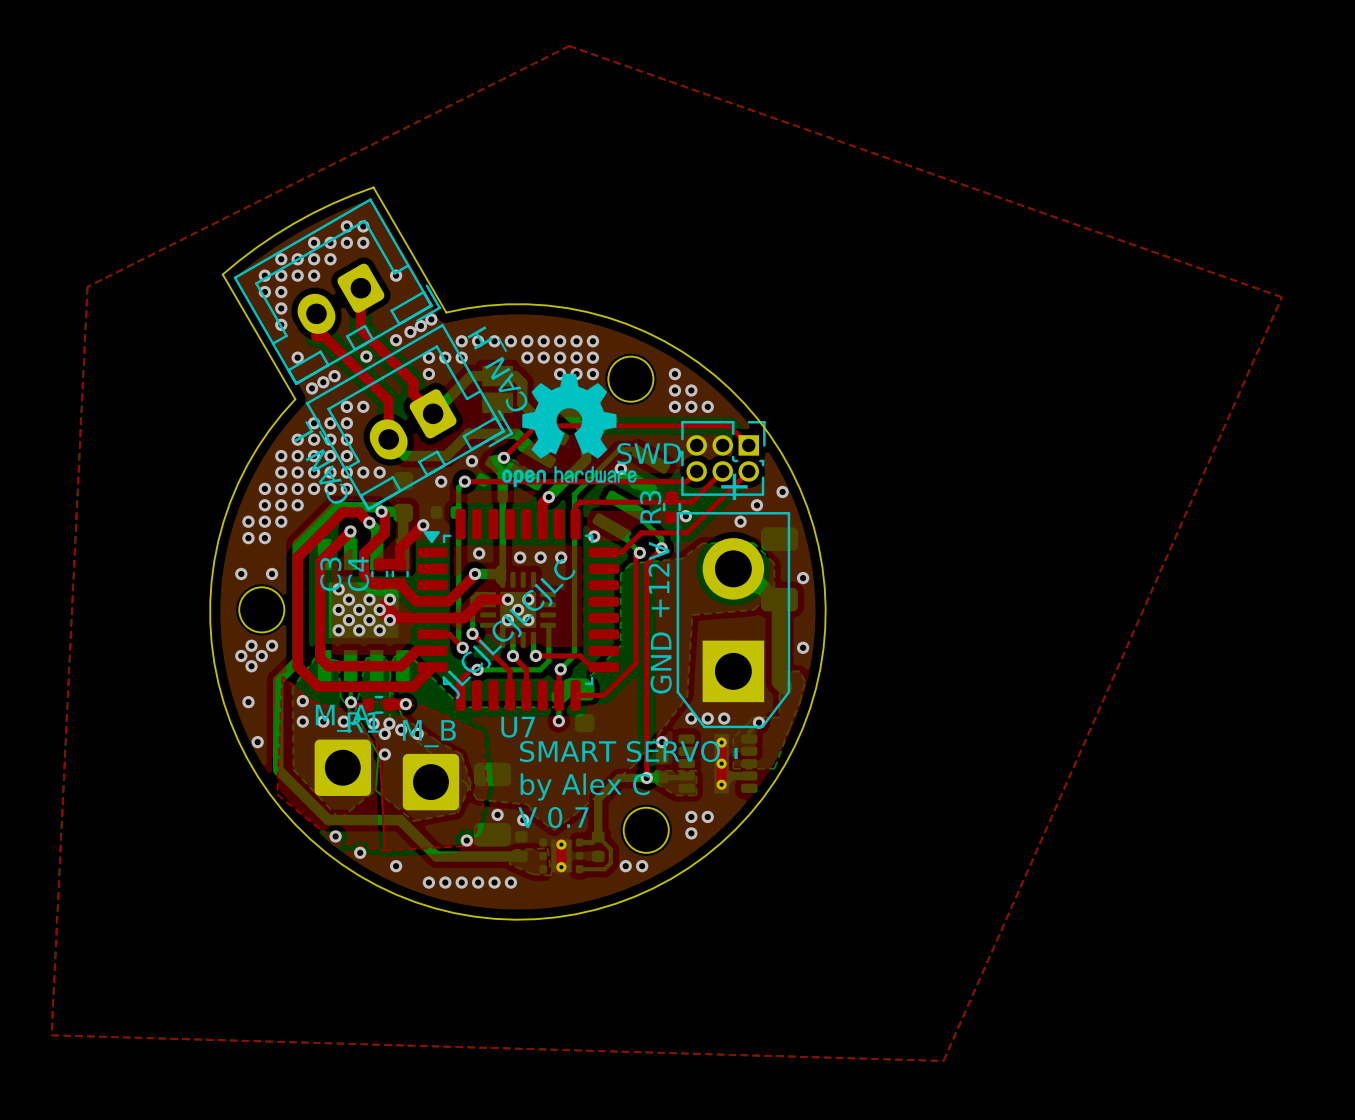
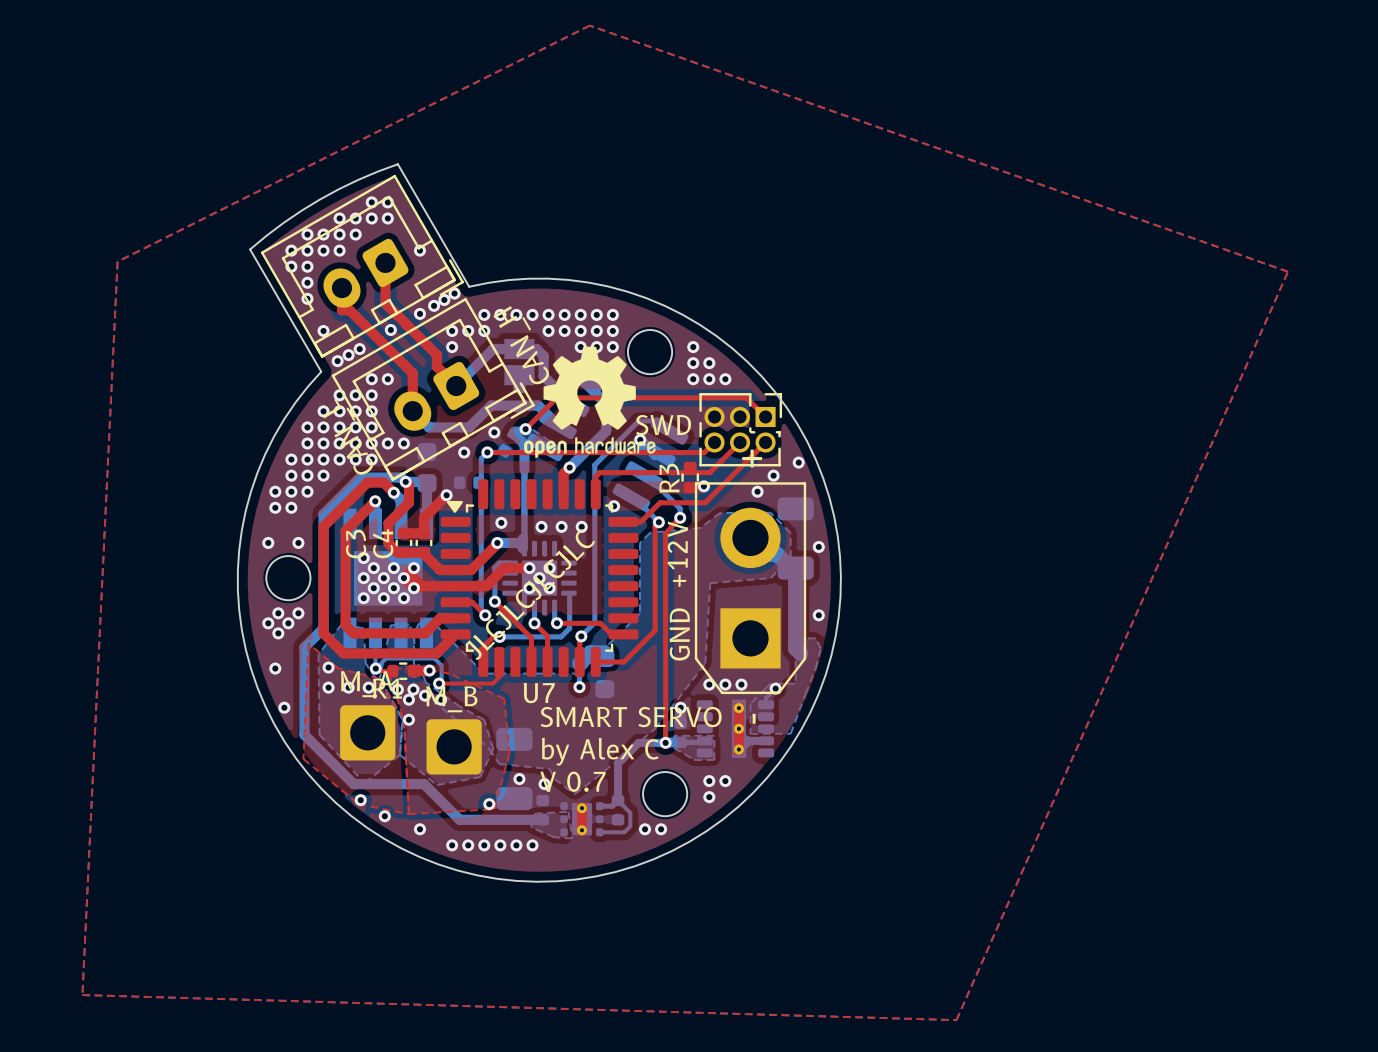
top track: none -> (499, 662) (499, 677) (492, 683) (439, 683)
bottom track: none -> (375, 668) (385, 658) (434, 658) (441, 665) (441, 681) (439, 683)
via: none -> (439, 683)

